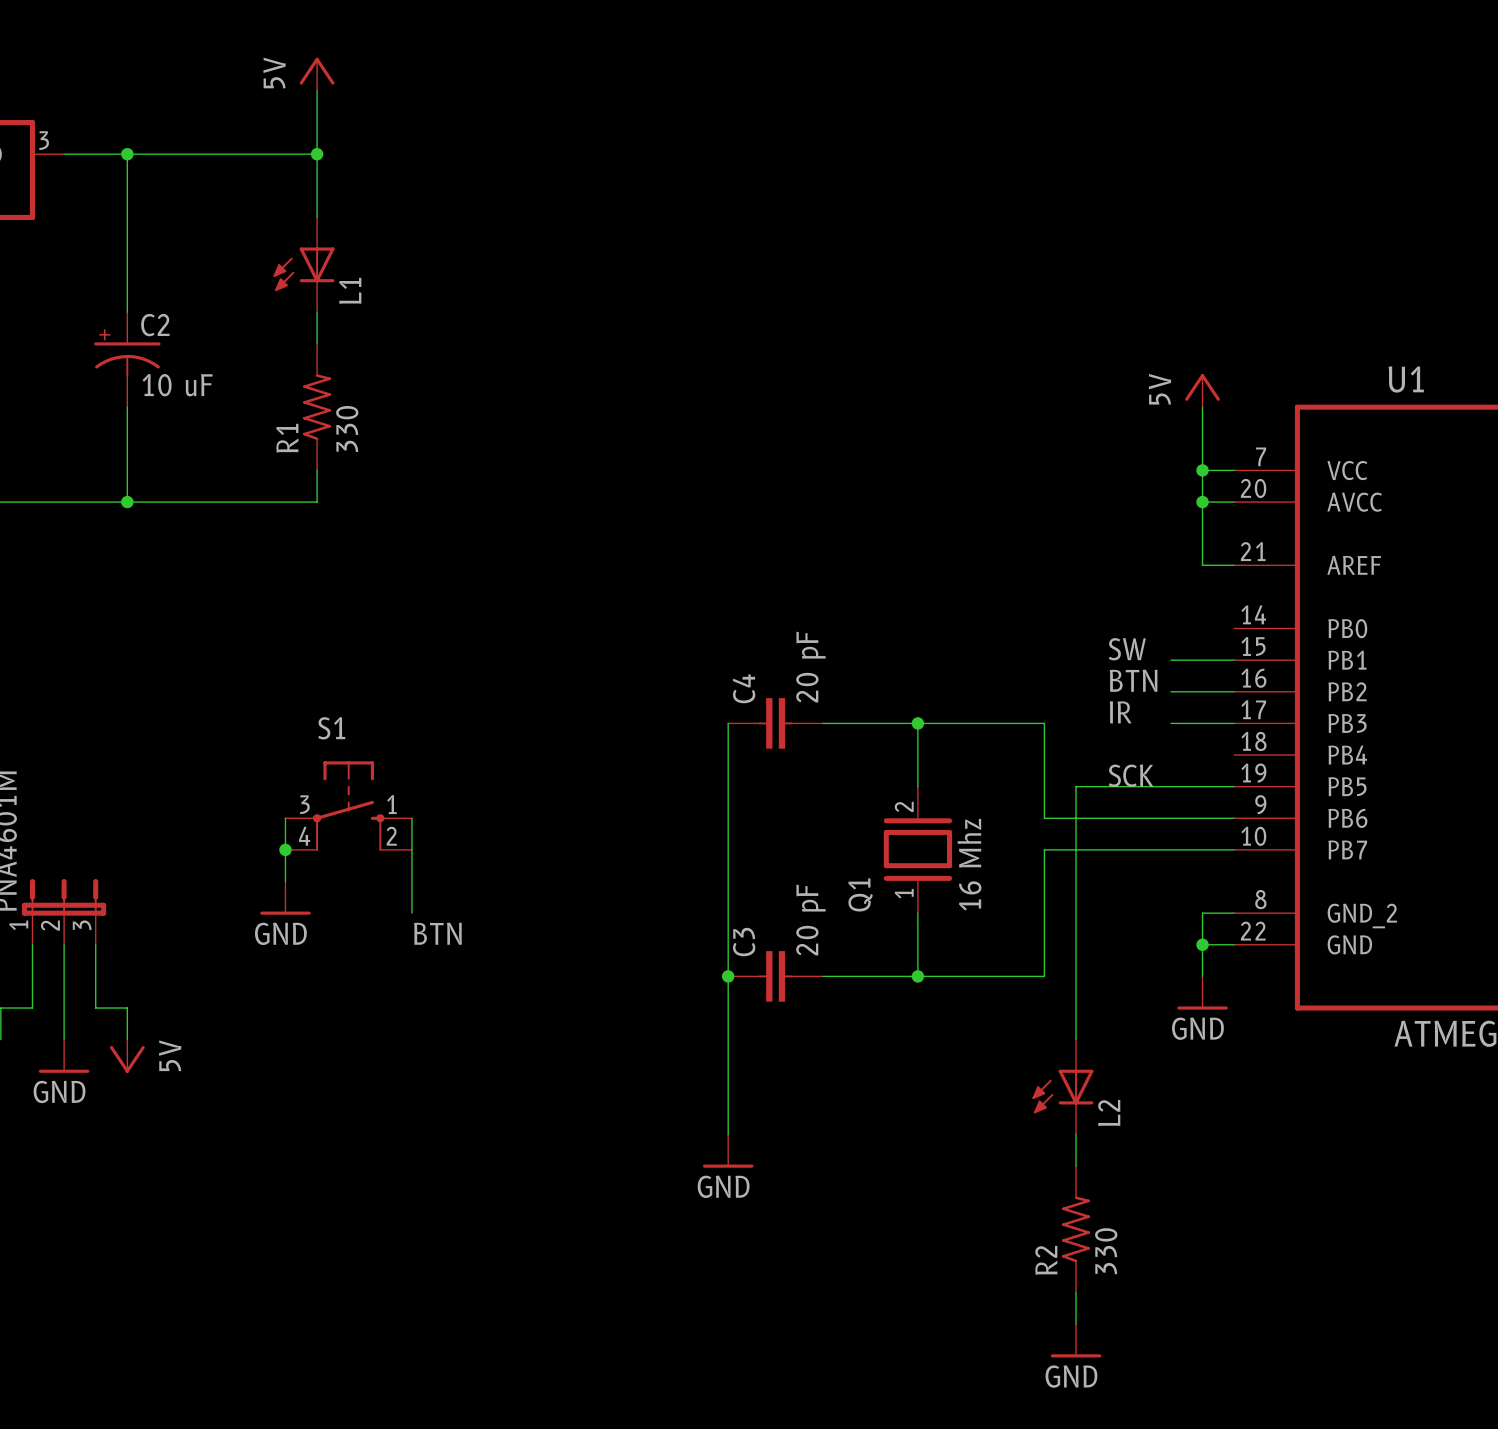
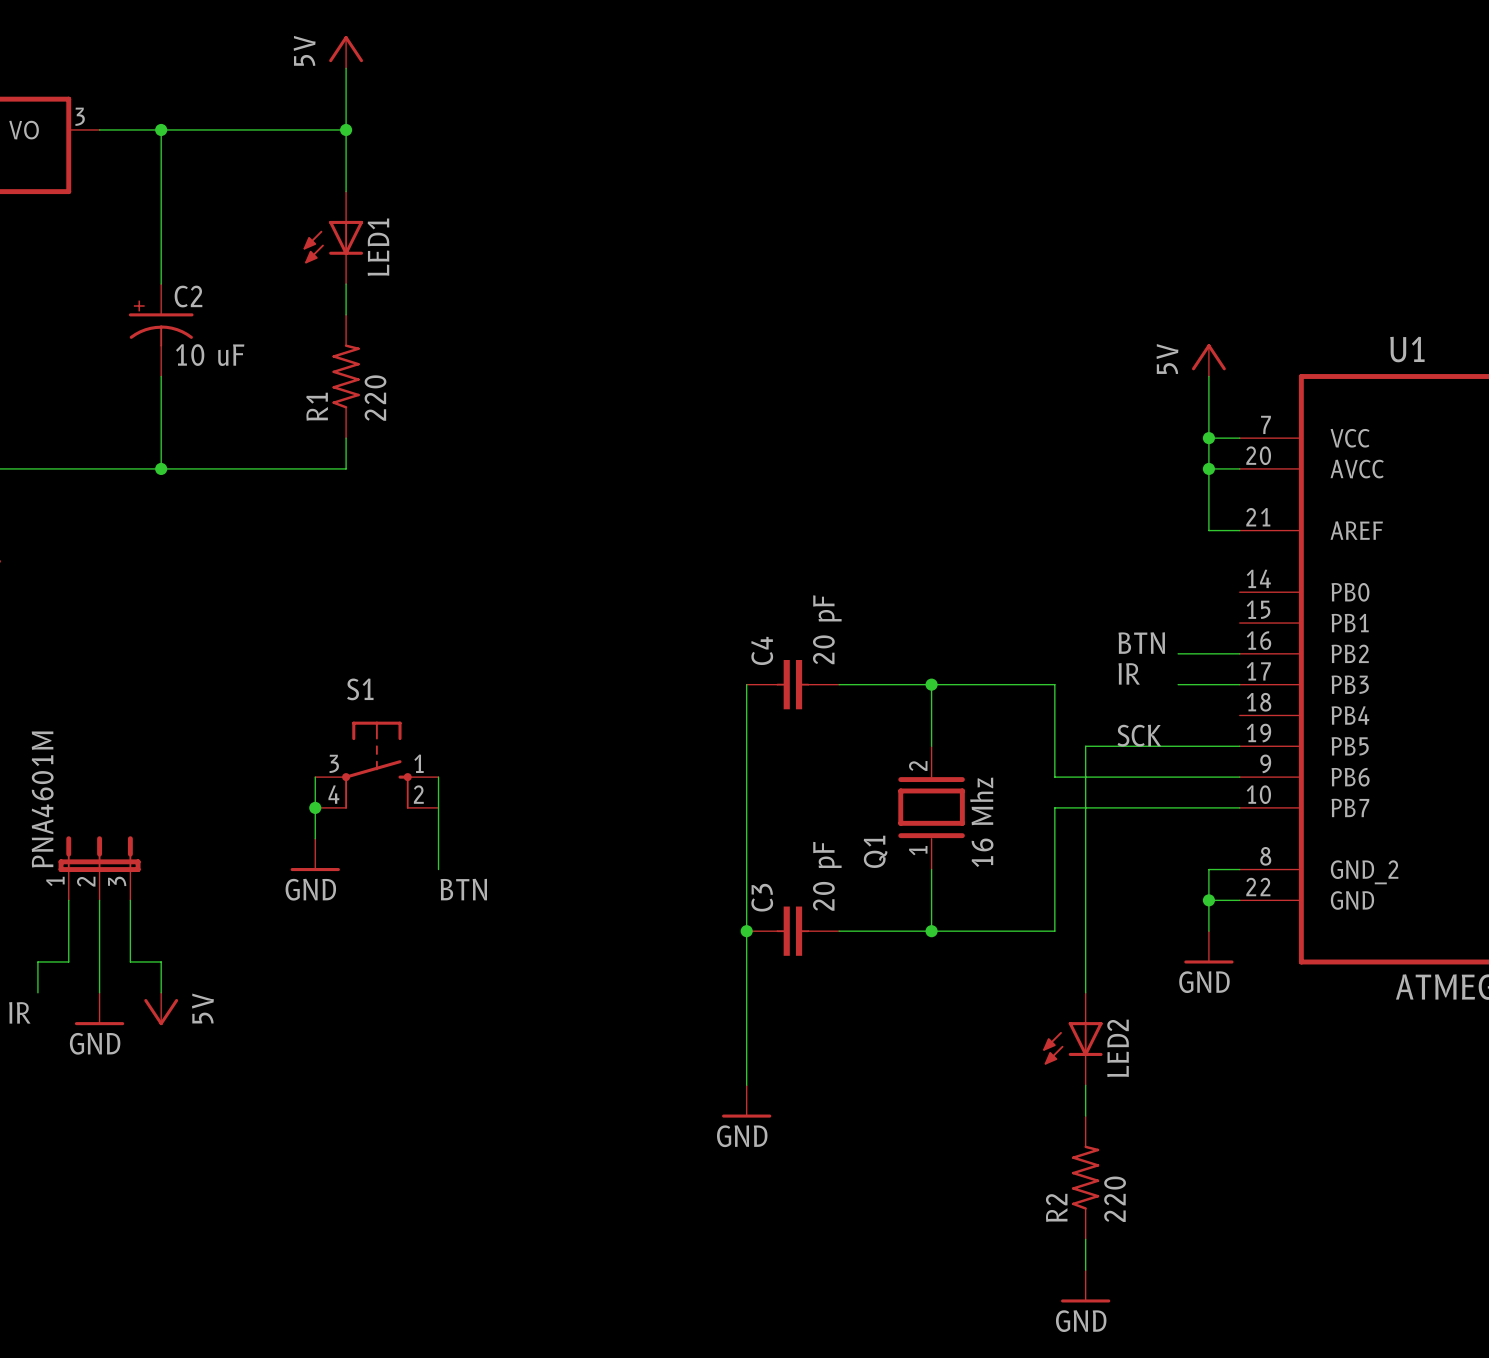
L1 name: L1 (350, 290) -> LED1 (378, 247)
R1 value: 330 (347, 428) -> 220 (375, 398)
label: SW (1127, 649) -> none
wire: (1170, 660) (1234, 660) -> none
L2 name: L2 (1109, 1113) -> LED2 (1118, 1048)
R2 value: 330 (1106, 1251) -> 220 (1115, 1199)

